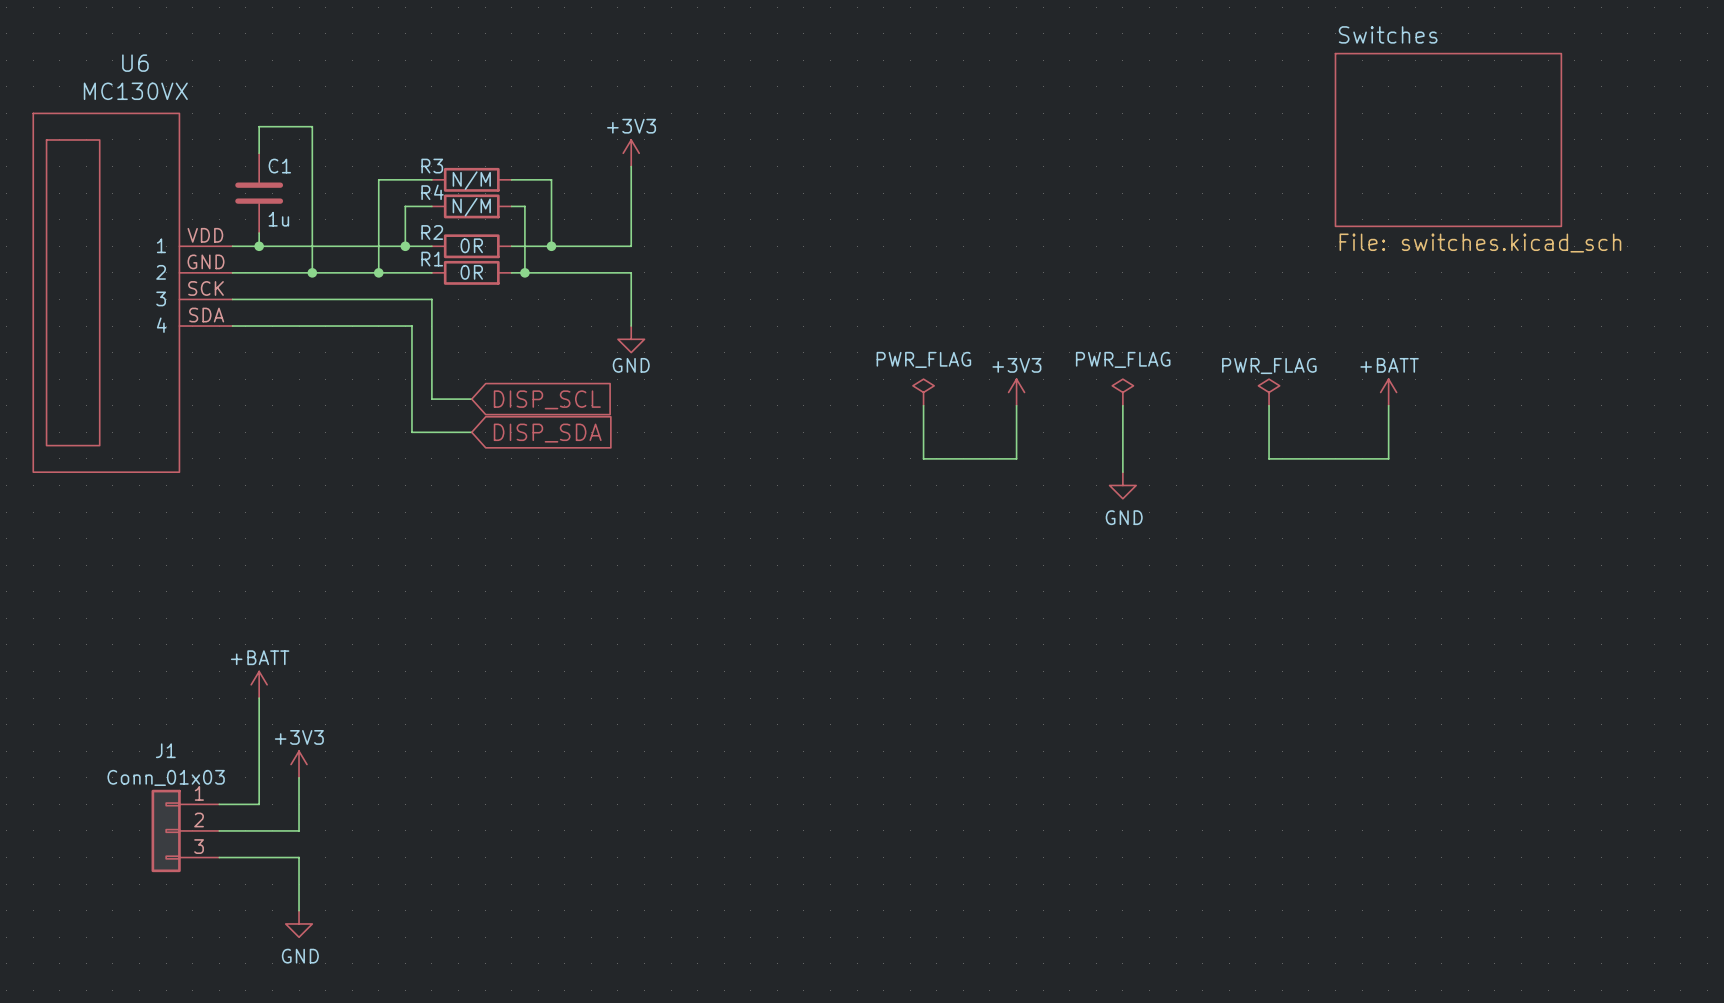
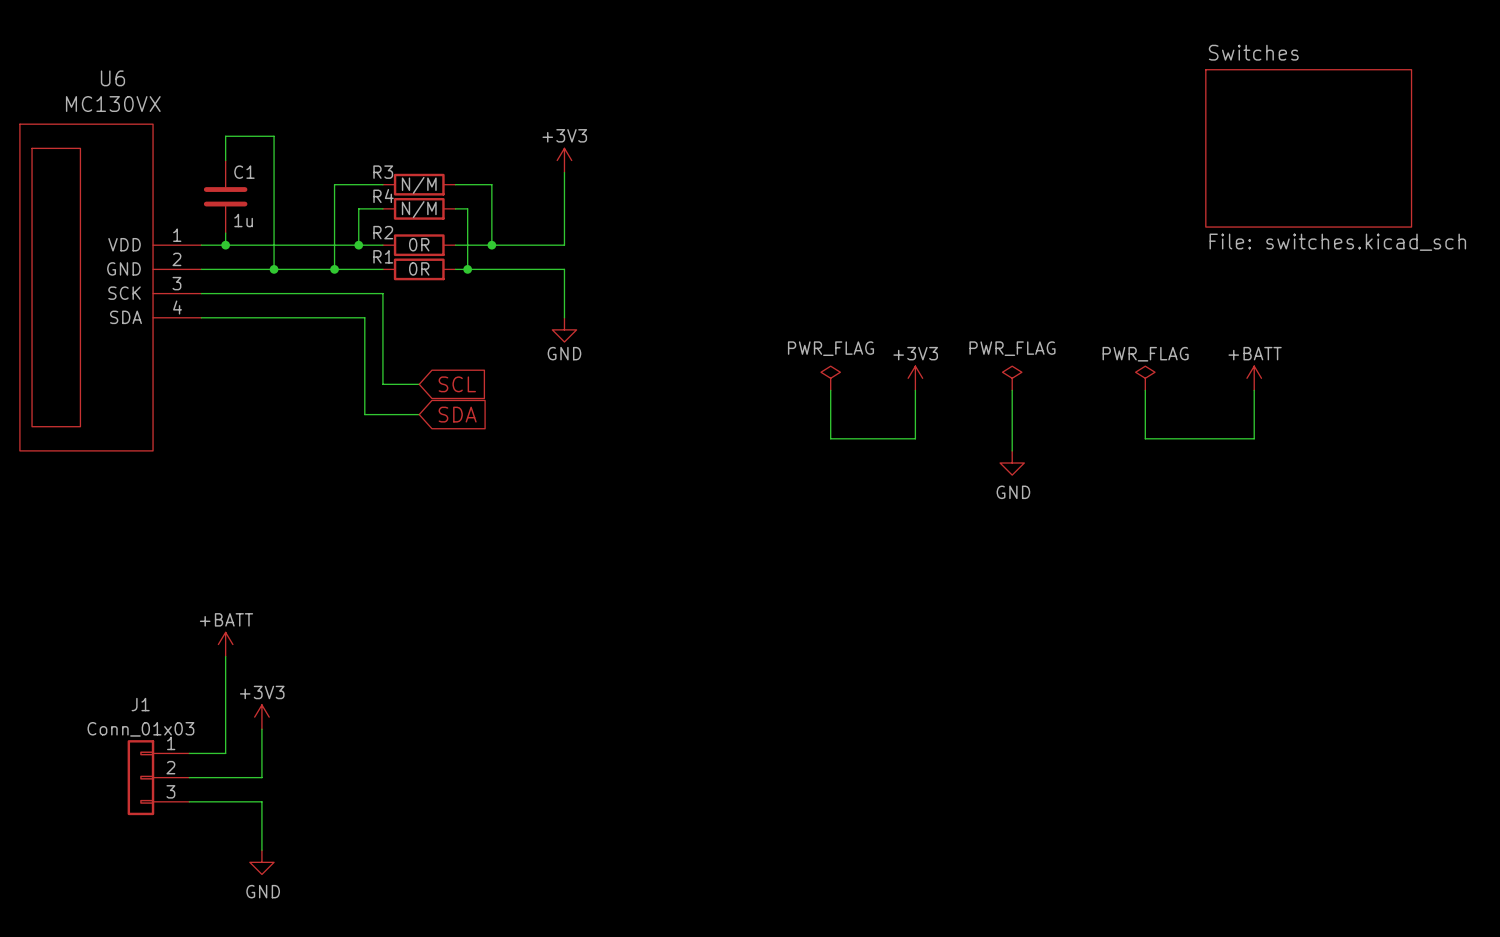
U6 pin number: VDD (205, 235) -> 1 (177, 235)
U6 pin name: 1 (161, 245) -> VDD (124, 244)
U6 pin number: GND (206, 261) -> 2 (176, 259)
U6 pin name: 2 (161, 272) -> GND (123, 268)
U6 pin number: SCK (206, 288) -> 3 (176, 283)
U6 pin name: 3 (161, 298) -> SCK (124, 293)
U6 pin number: SDA (206, 315) -> 4 (177, 307)
U6 pin name: 4 (161, 325) -> SDA (125, 317)
global label: DISP_SCL (547, 399) -> SCL (457, 384)
global label: DISP_SDA (547, 433) -> SDA (457, 414)

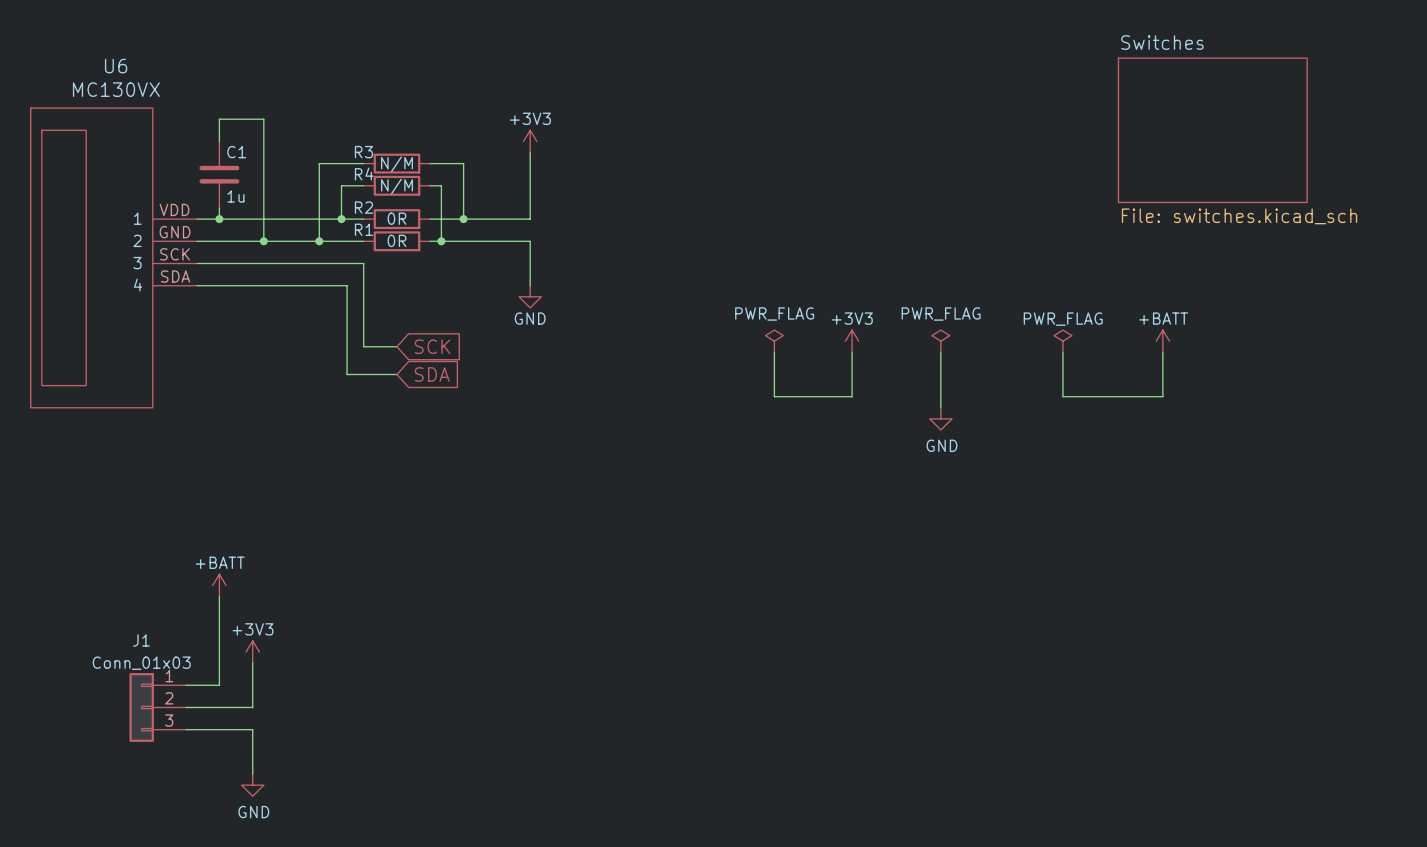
U6 pin number: 1 (177, 235) -> VDD (174, 209)
U6 pin name: VDD (124, 244) -> 1 (137, 218)
U6 pin number: 2 (176, 259) -> GND (175, 232)
U6 pin name: GND (123, 268) -> 2 (137, 240)
U6 pin number: 3 (176, 283) -> SCK (175, 254)
U6 pin name: SCK (124, 293) -> 3 (137, 263)
U6 pin number: 4 (177, 307) -> SDA (175, 276)
U6 pin name: SDA (125, 317) -> 4 (138, 285)
global label: SCL (457, 384) -> SCK (432, 346)

